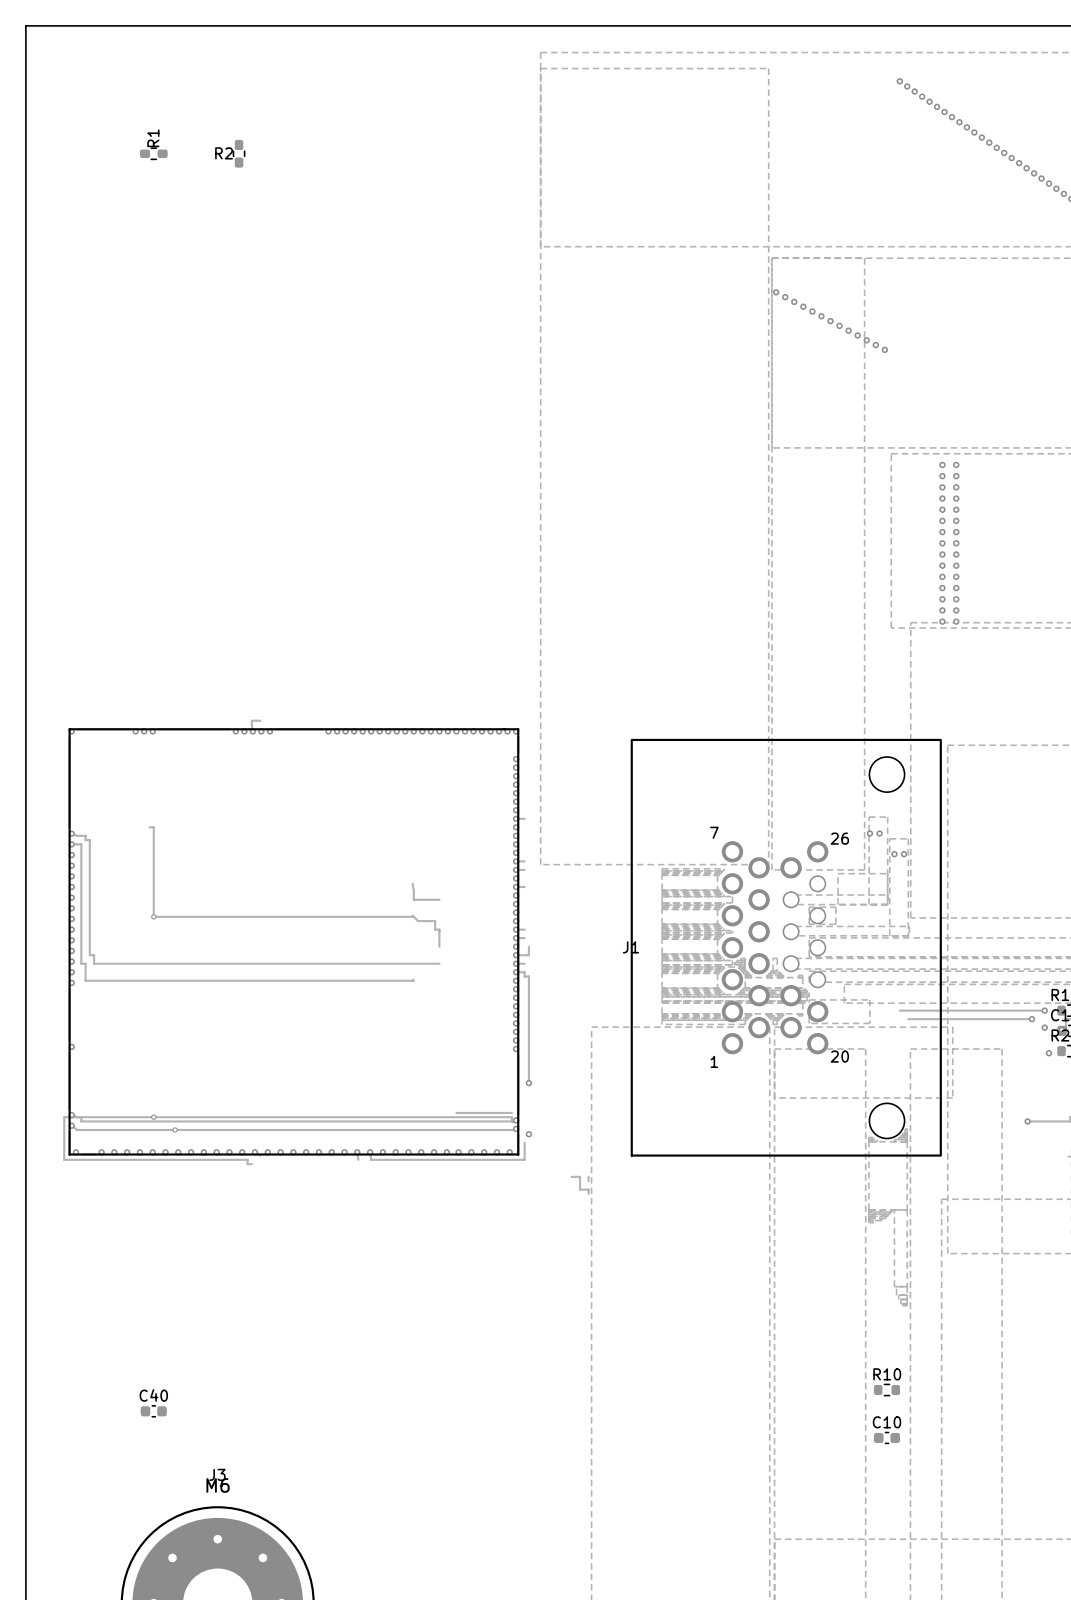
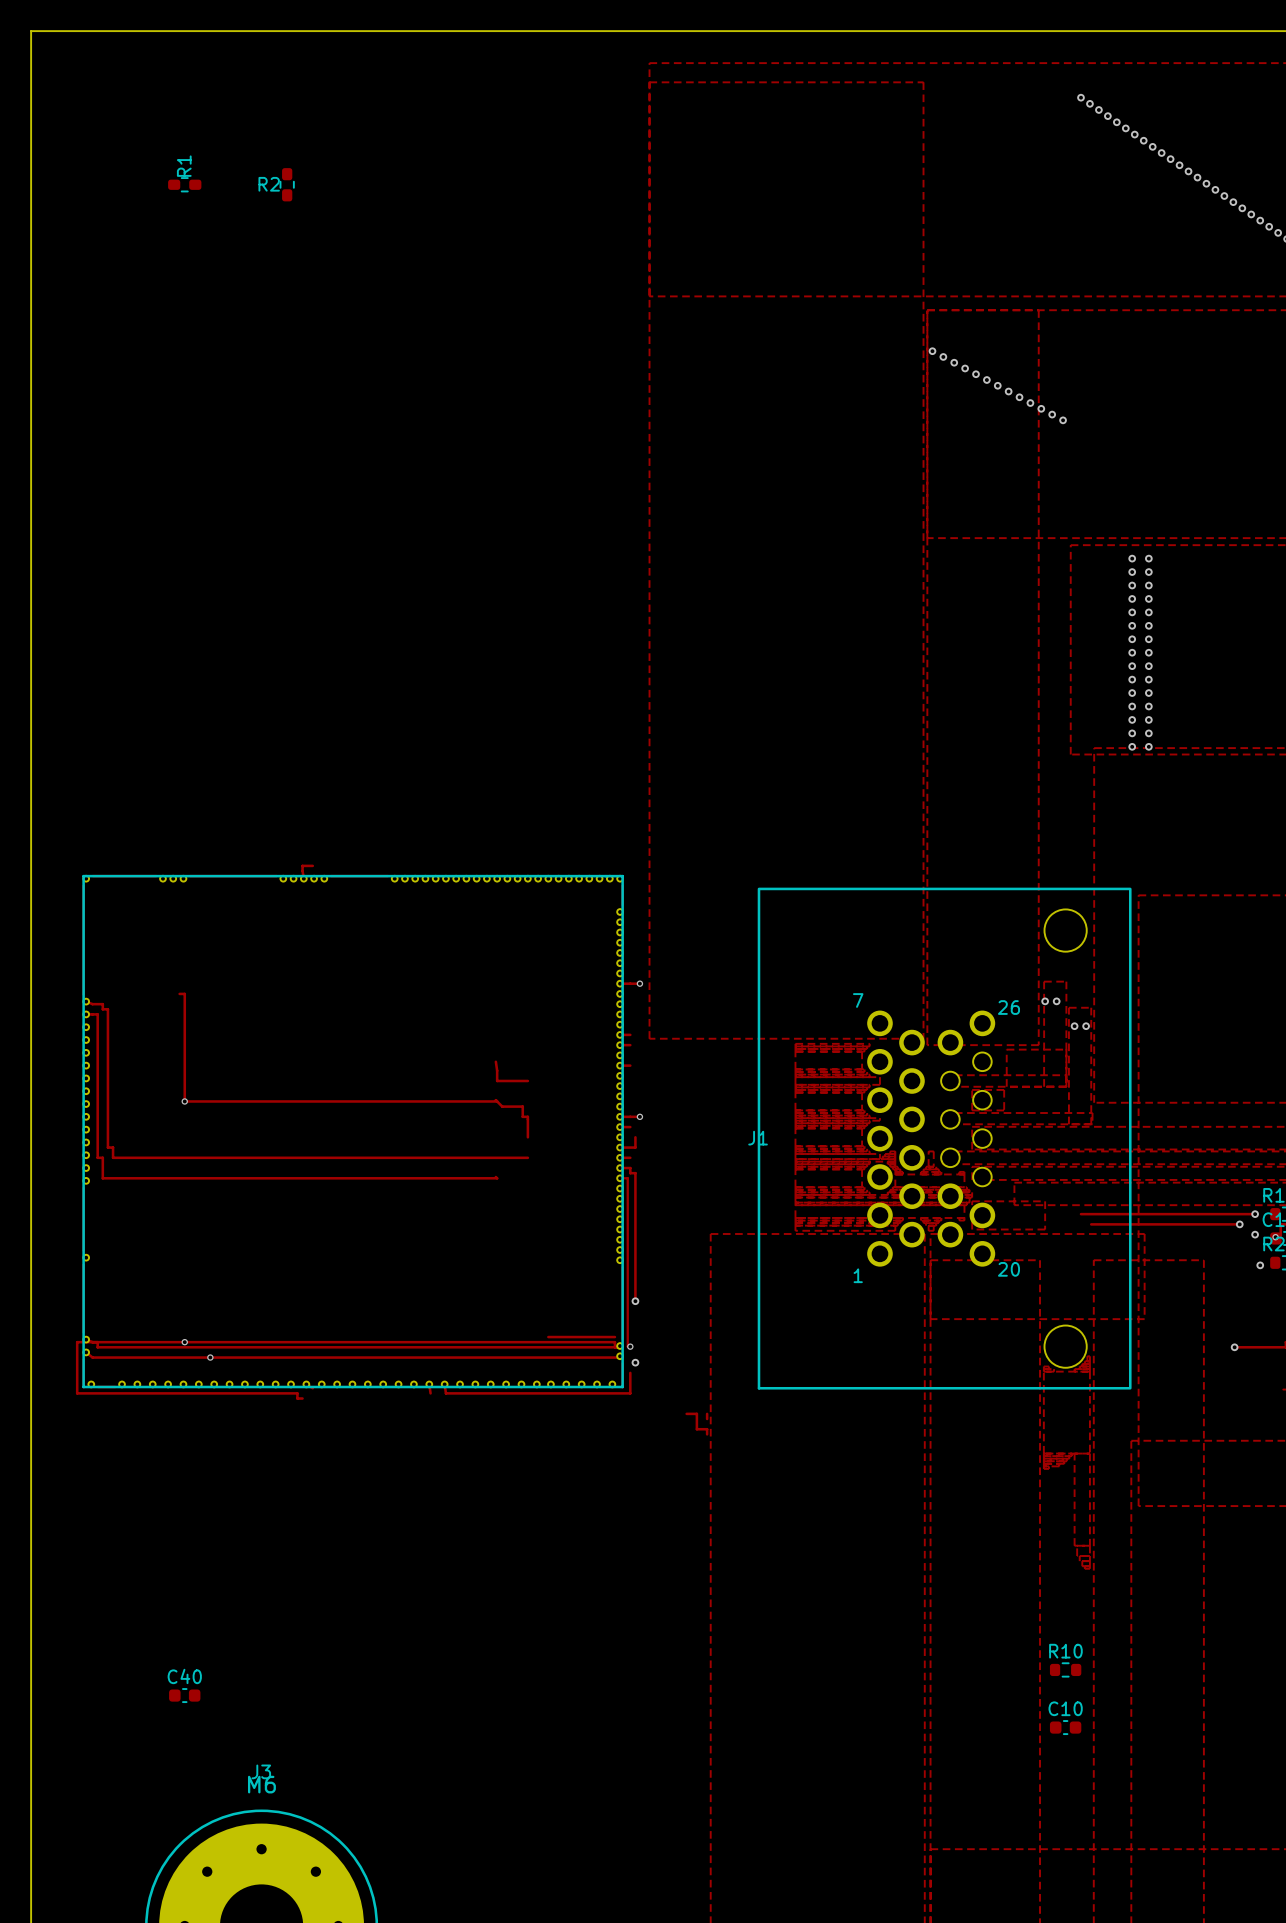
track: none -> (630, 983) (639, 983)
via: none -> (639, 983)
track: none -> (630, 1116) (639, 1116)
via: none -> (639, 1116)
track: none -> (620, 1178) (627, 1178) (627, 1346) (630, 1346)
via: none -> (630, 1346)

